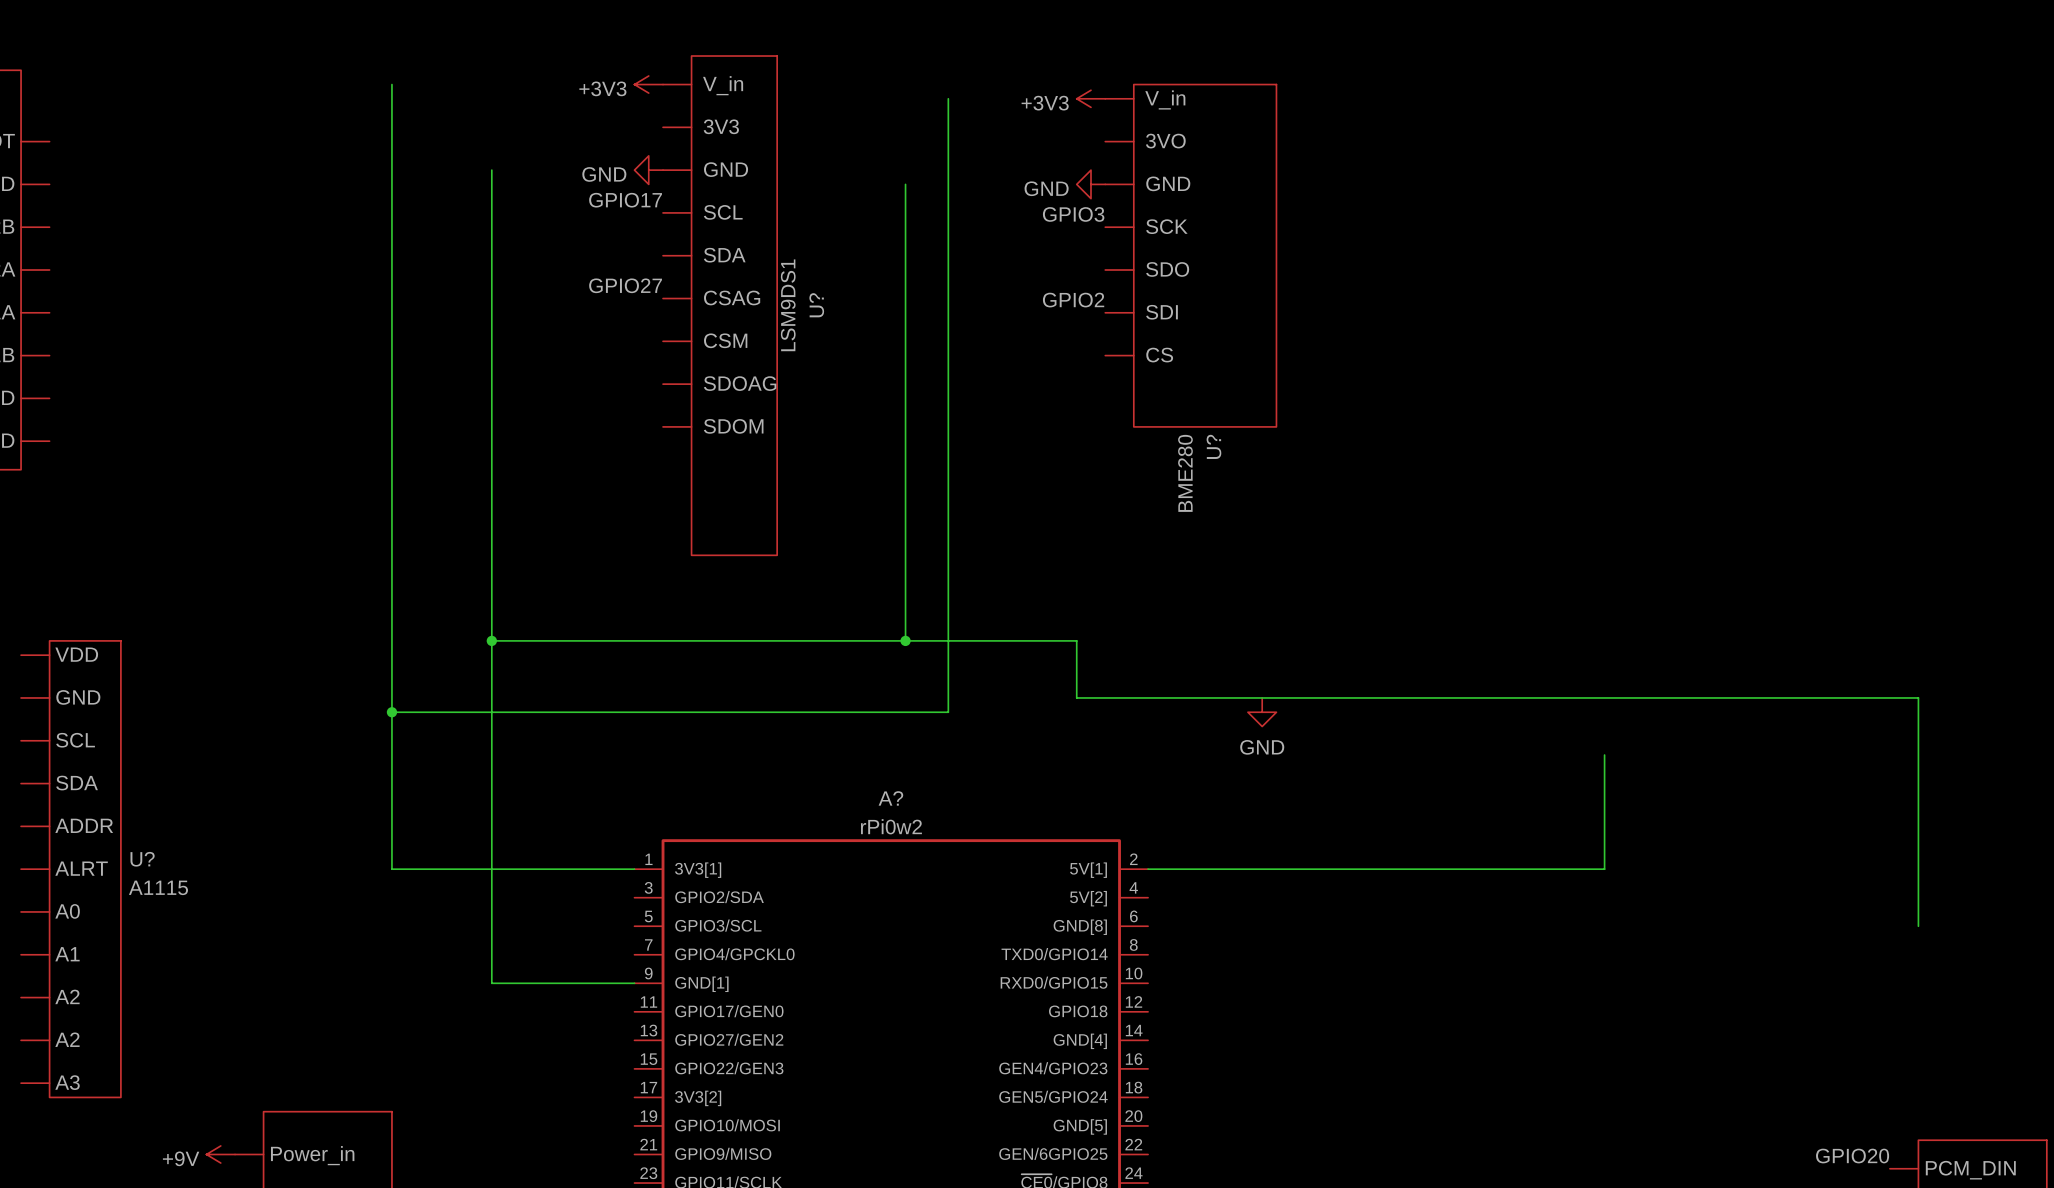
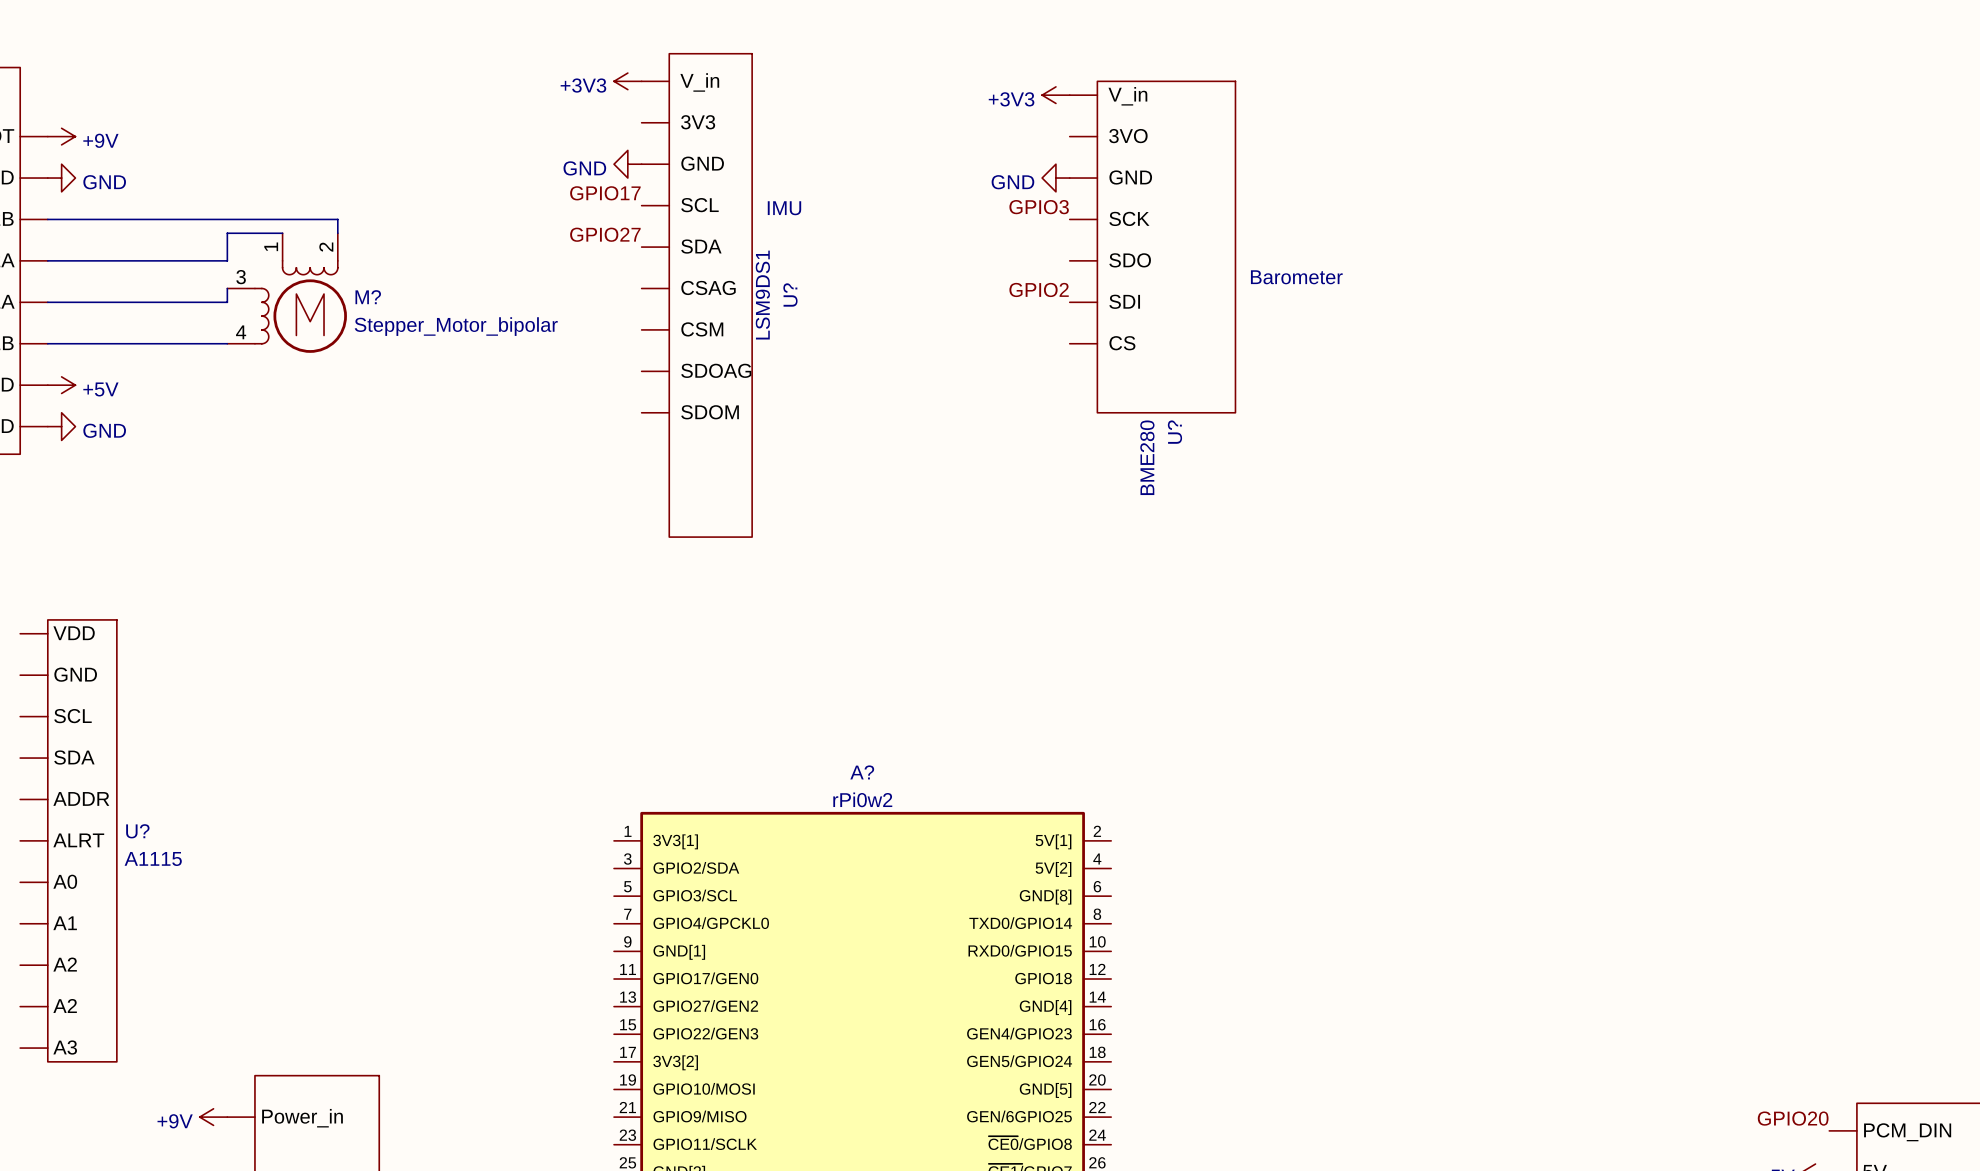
wire: (391, 84) (391, 869) (634, 869) -> none
wire: (948, 98) (948, 712) (391, 712) -> none
power symbol: none -> +9V (61, 136)
wire: (491, 170) (491, 983) (634, 983) -> none
power symbol: none -> GND (61, 178)
wire: (905, 184) (905, 640) -> none
text: none -> IMU (784, 208)
wire: none -> (47, 219) (337, 219) (337, 233)
wire: none -> (282, 233) (227, 233) (227, 260) (47, 260)
label position: GPIO27 (625, 285) -> GPIO27 (605, 234)
text: none -> Barometer (1296, 277)
wire: none -> (227, 288) (227, 302) (47, 302)
M?: none -> Stepper_Motor_bipolar (287, 293)
wire: none -> (47, 343) (227, 343)
power symbol: none -> +5V (61, 385)
power symbol: none -> GND (61, 426)
wire: (491, 640) (1076, 640) (1076, 697) (1918, 697) (1918, 926) -> none
junction: (491, 640) -> none
junction: (905, 640) -> none
junction: (391, 712) -> none
power symbol: GND (1262, 712) -> none
wire: (1604, 755) (1604, 869) (1148, 869) -> none

